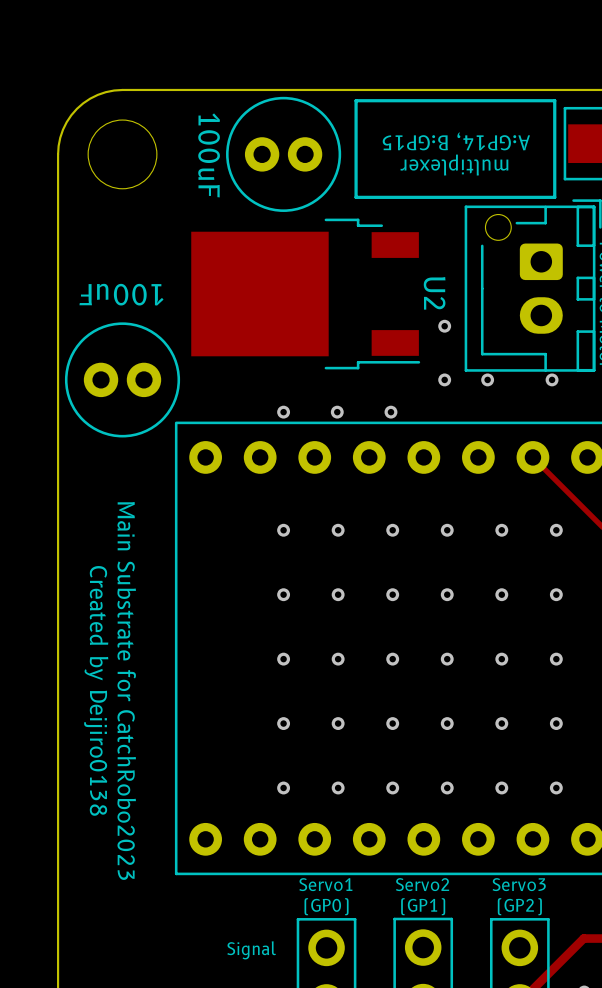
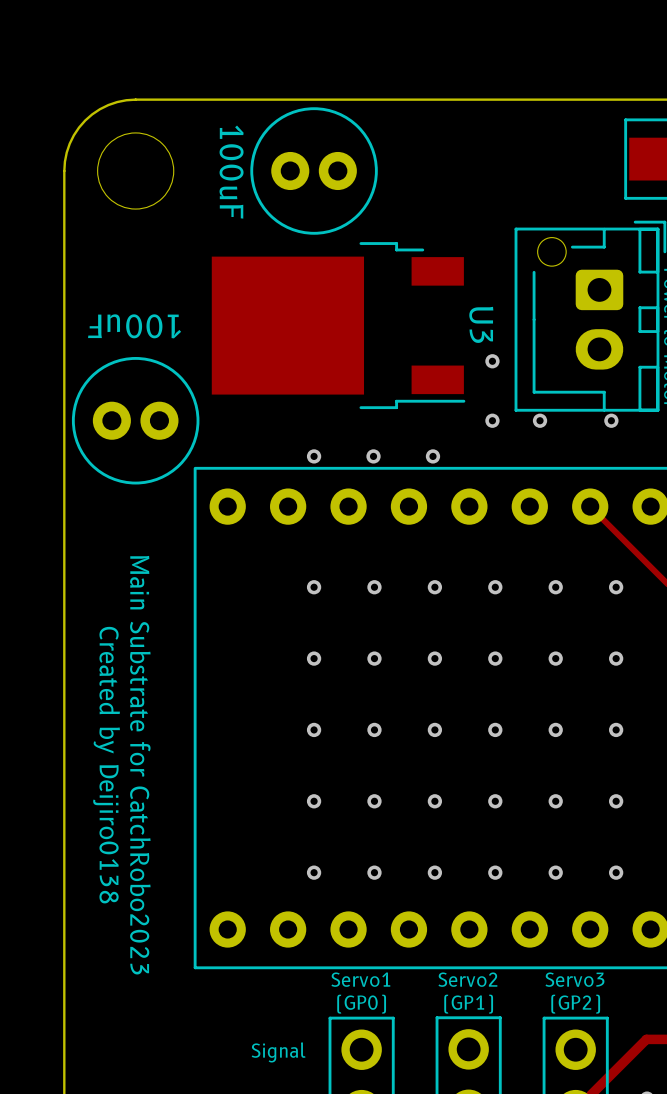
line: (356, 100) (554, 100) (554, 197) (356, 197) (356, 100) -> none
text: A:GP14, B:GP15 (456, 141) -> none
text: multiplexer (454, 165) -> none
U2 name: U2 (434, 293) -> U3 (481, 324)

